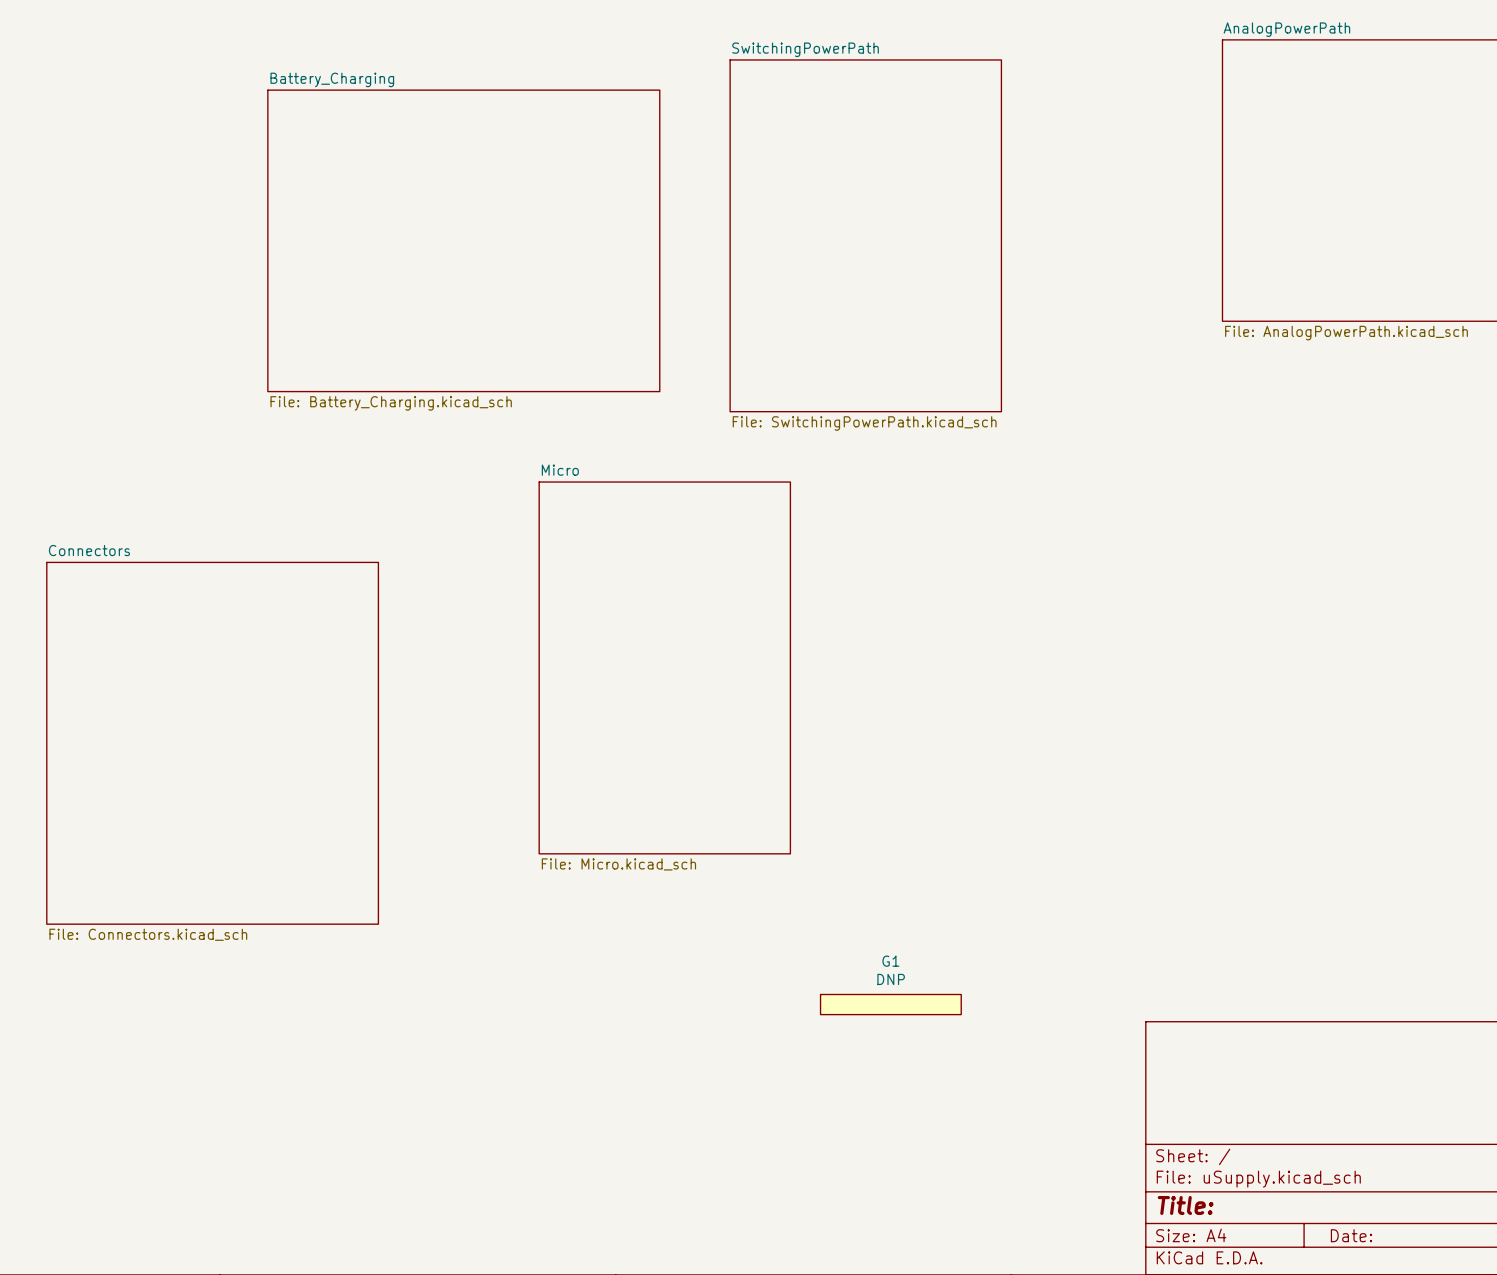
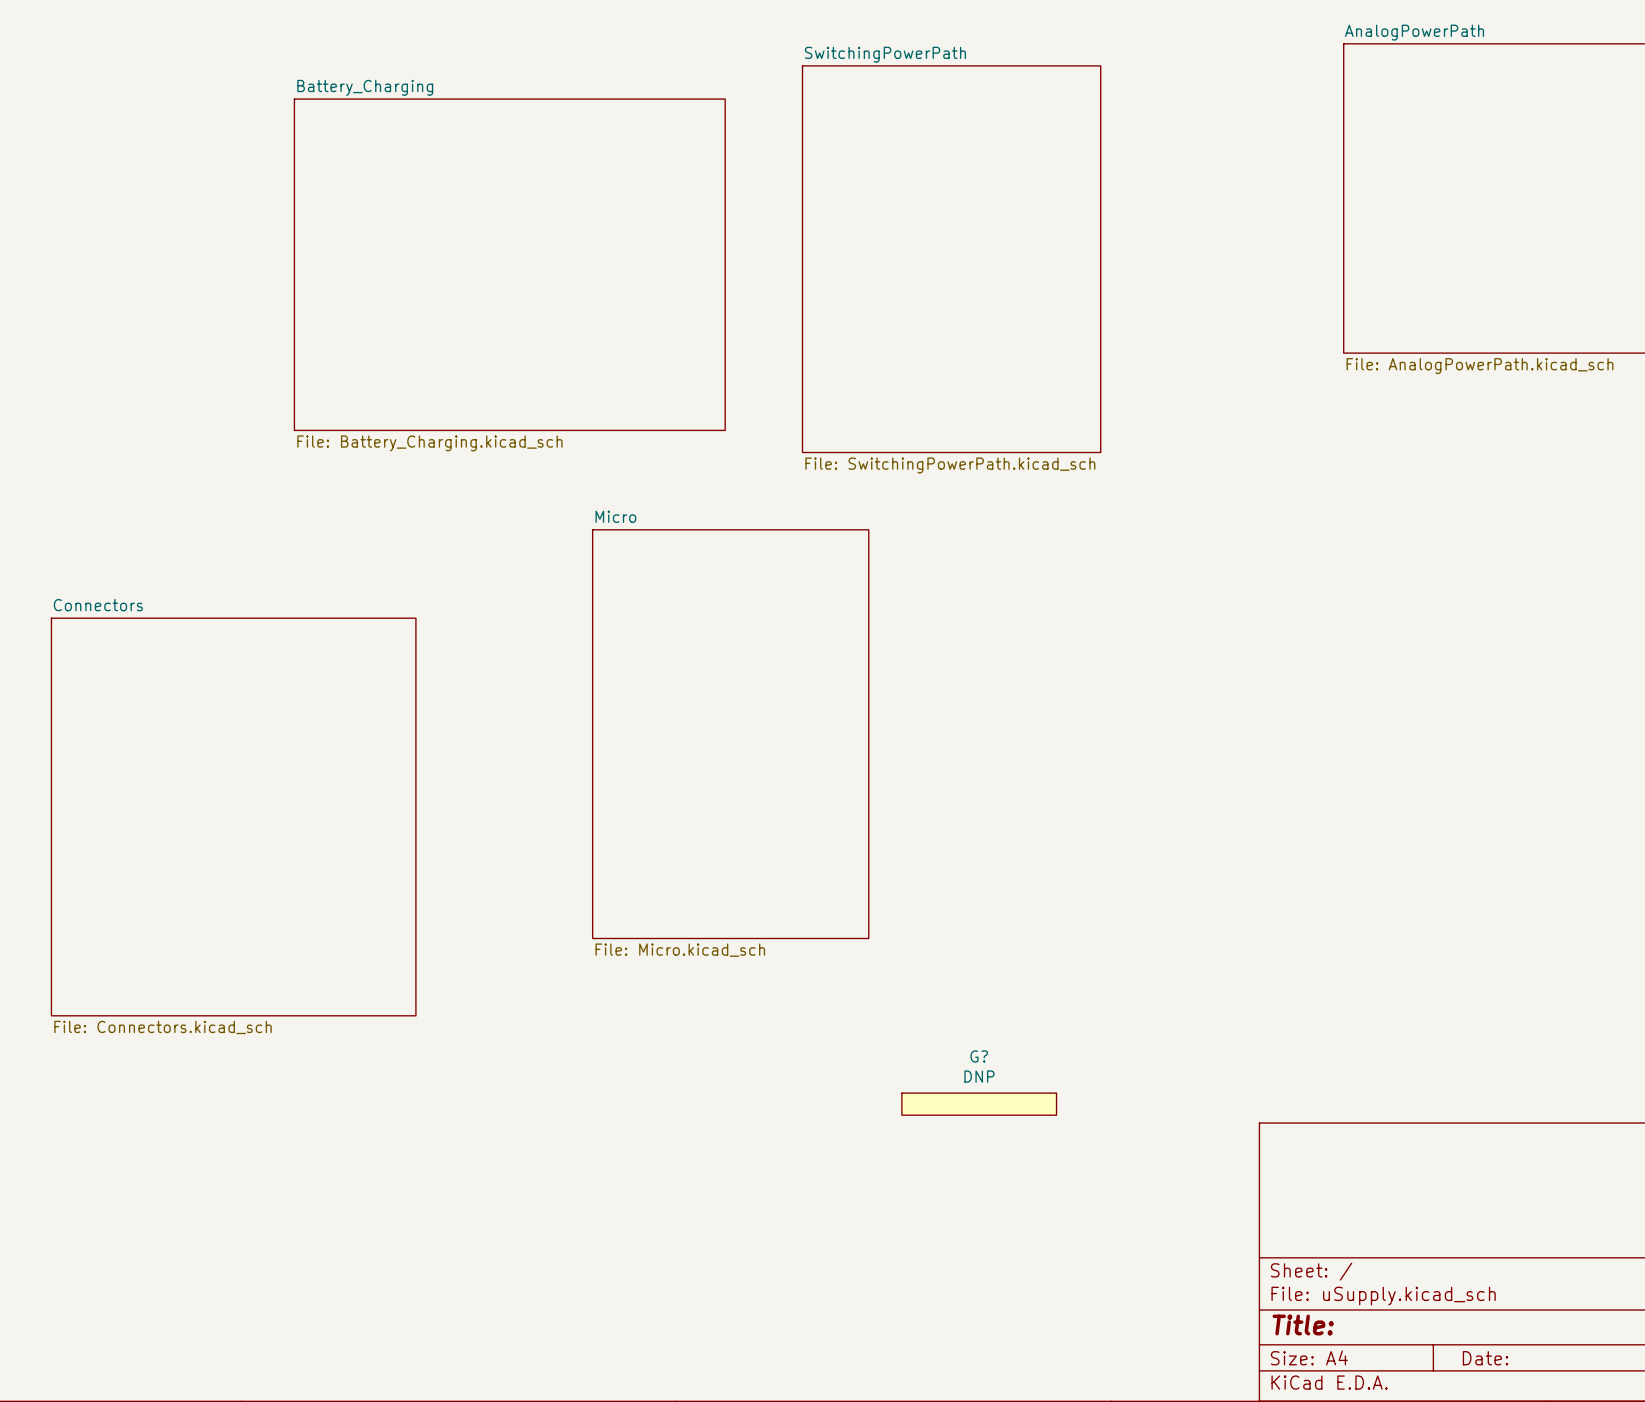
G1 name: G1 (890, 961) -> G? (979, 1056)

